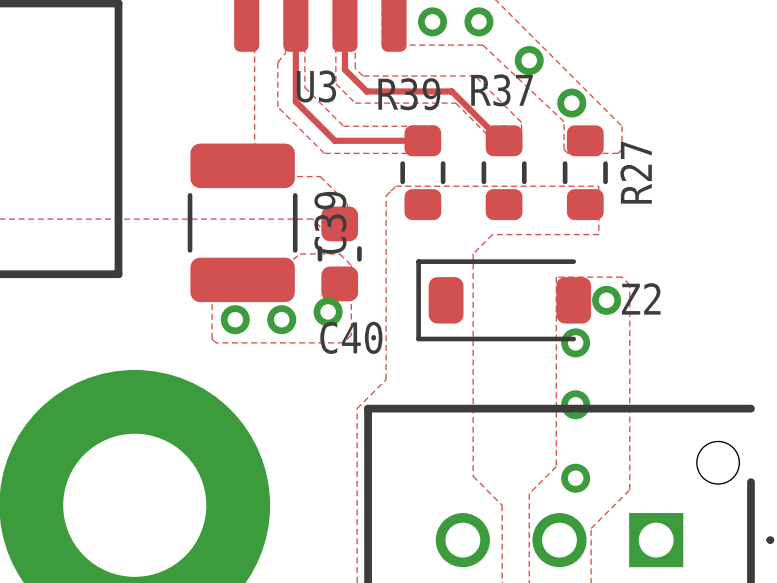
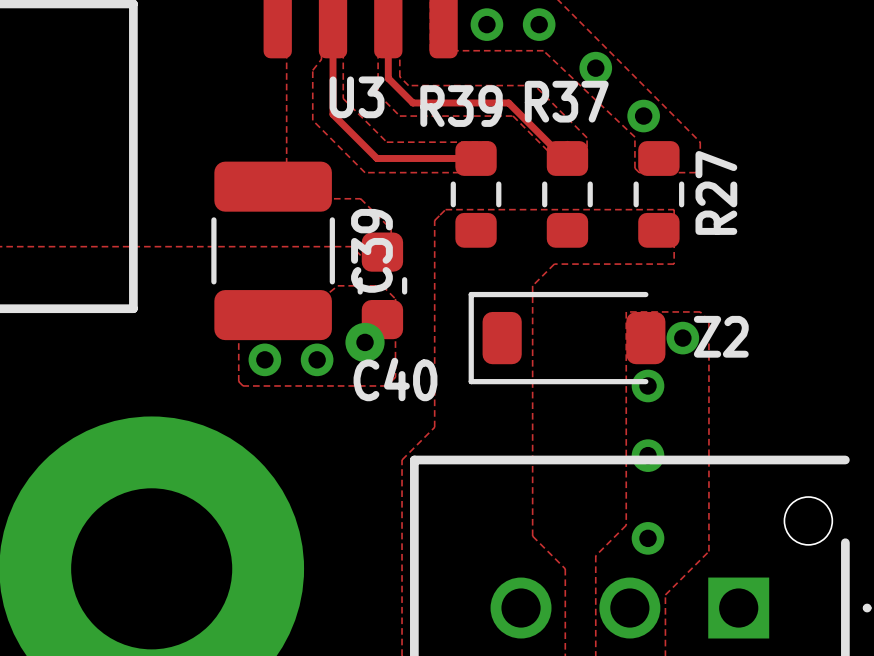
via size: [313, 297, 343, 327] -> [345, 322, 385, 363]

